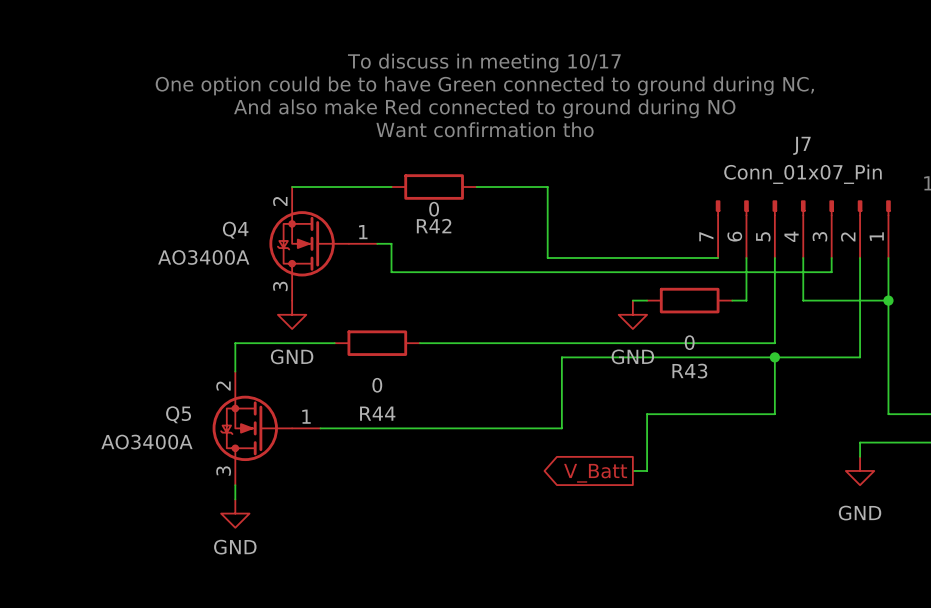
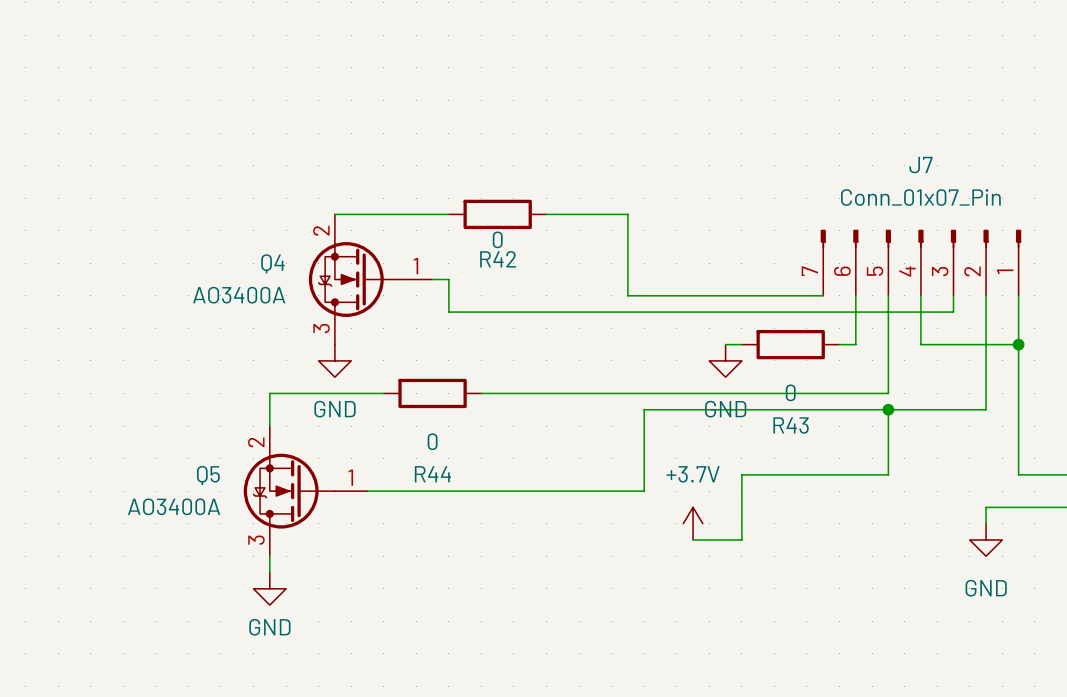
text: To discuss in meeting 10/17 (484, 63) -> none
text: One option could be to have Green connected to ground during NC, (484, 85) -> none
text: And also make Red connected to ground during NO (484, 108) -> none
text: Want confirmation tho (485, 129) -> none
power symbol: none -> +3.7V (693, 523)
wire: none -> (693, 539) (725, 539)
global label: V_Batt (595, 473) -> none

